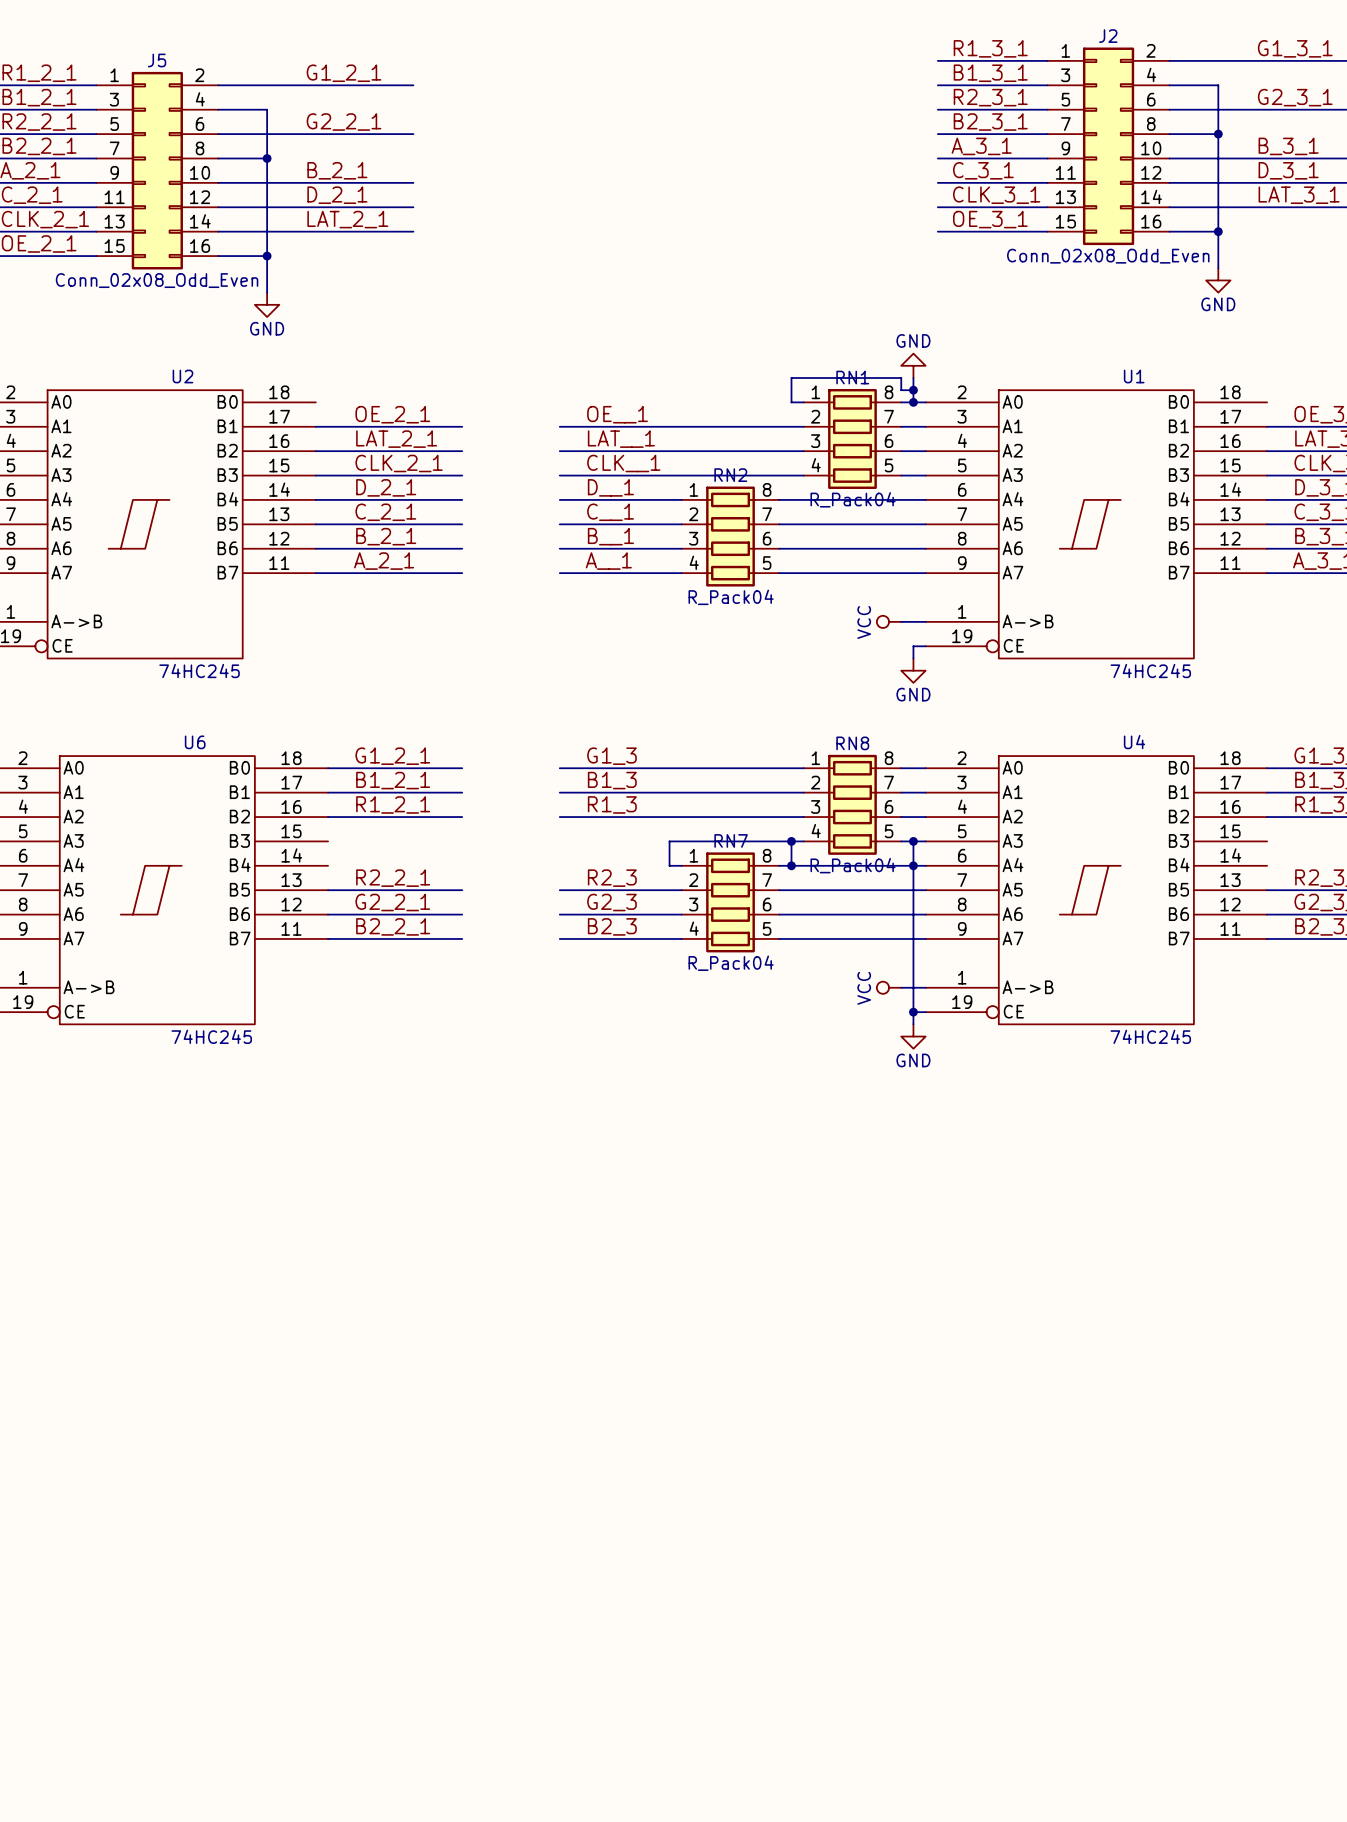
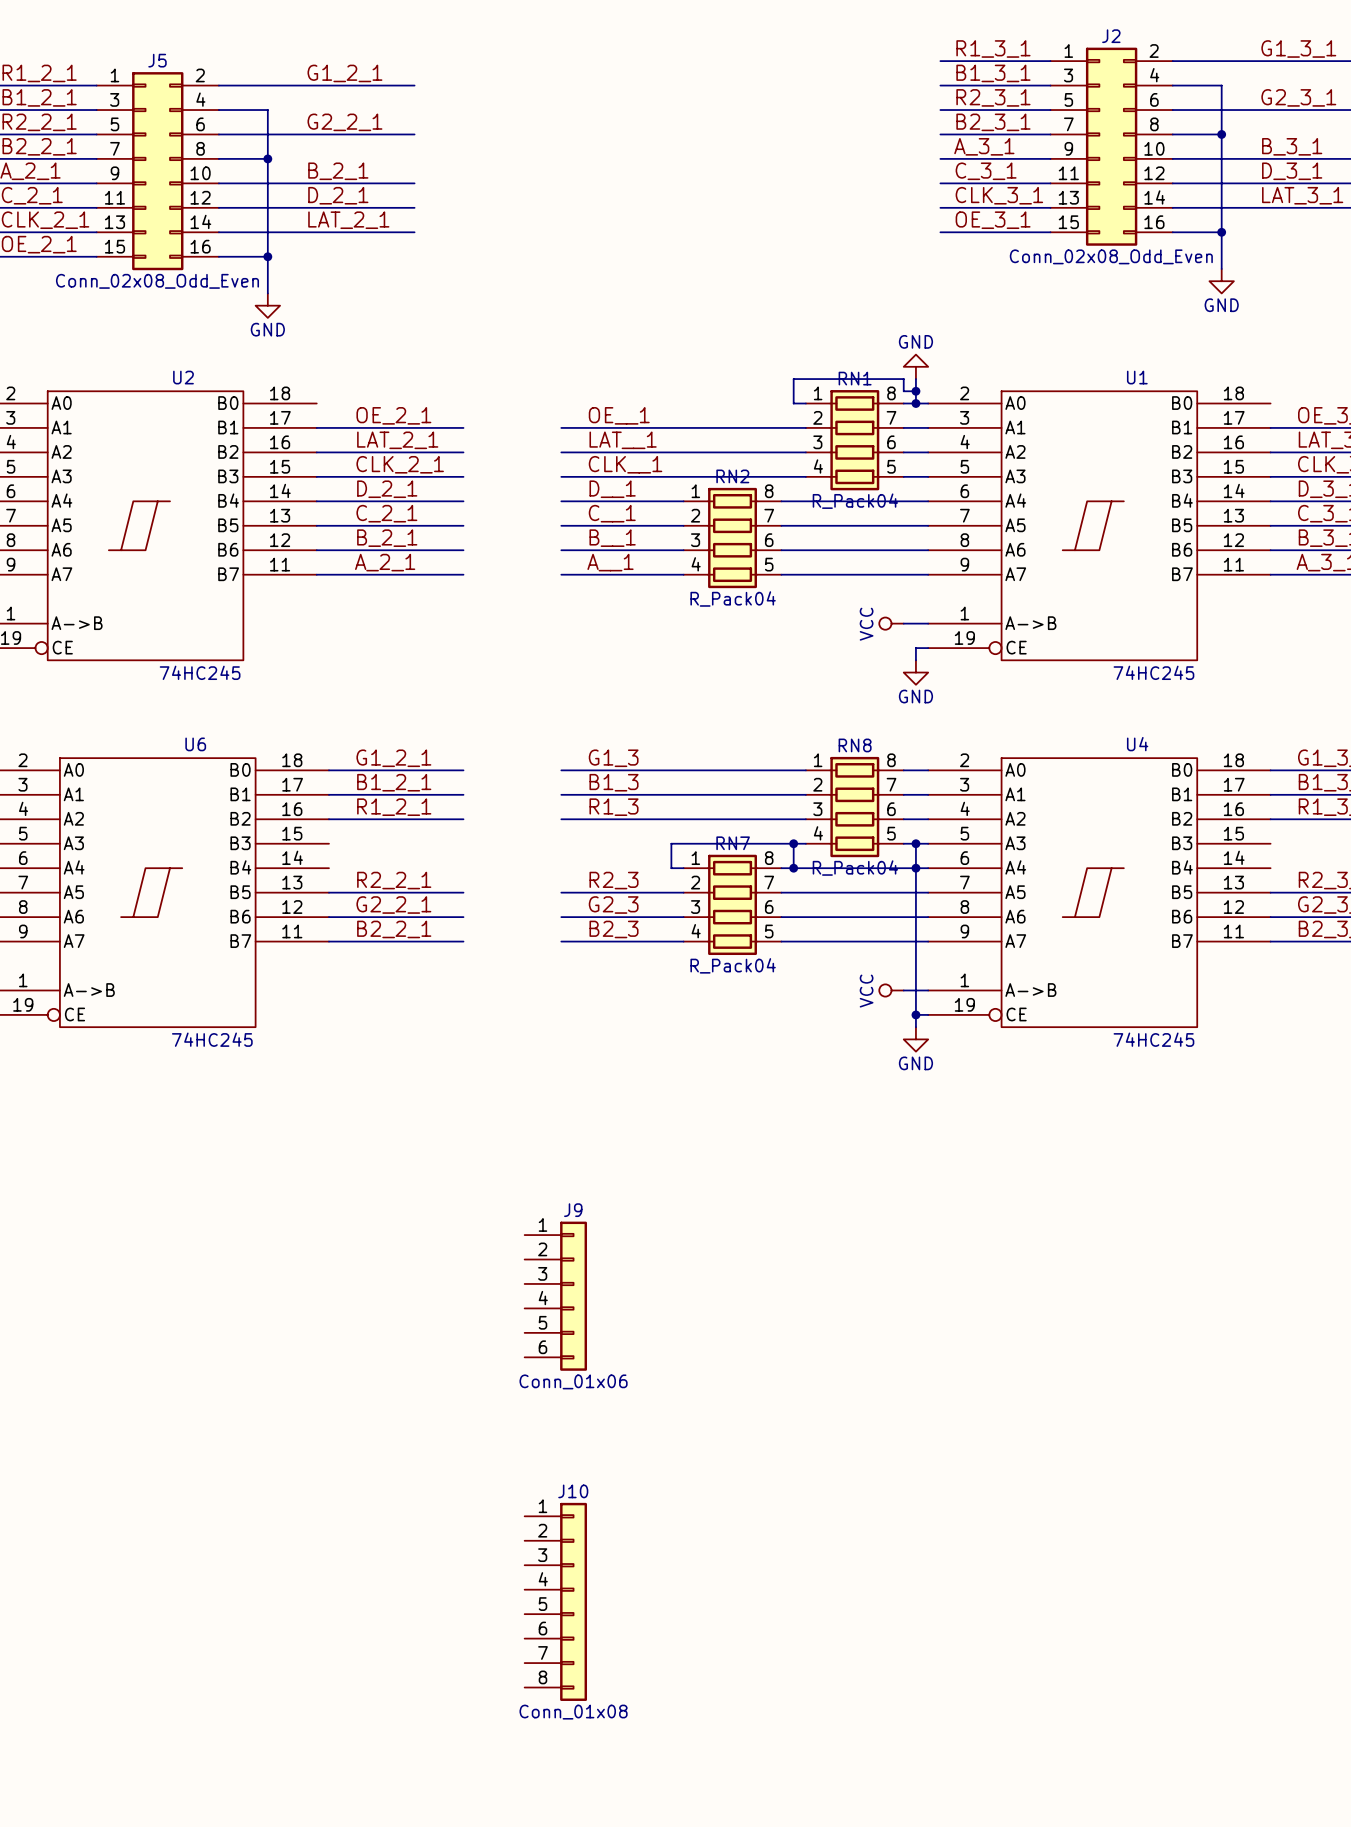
J9: none -> Conn_01x06 (555, 1296)
J10: none -> Conn_01x08 (555, 1601)

